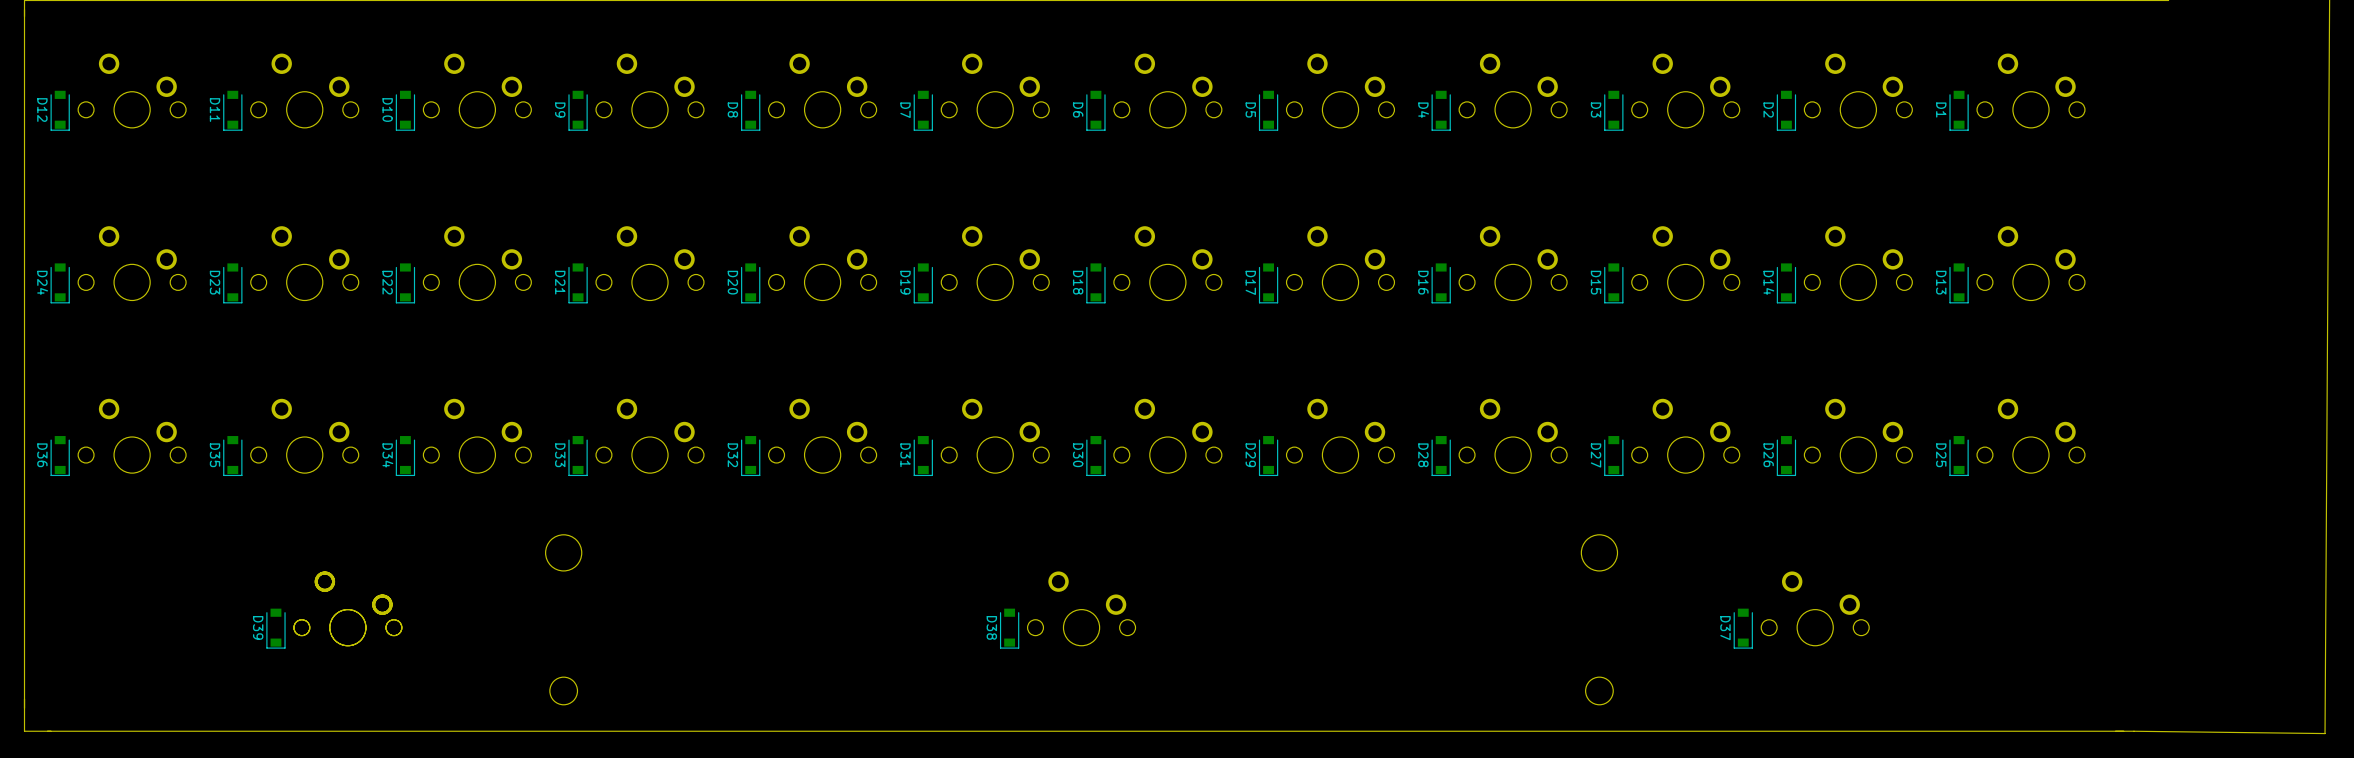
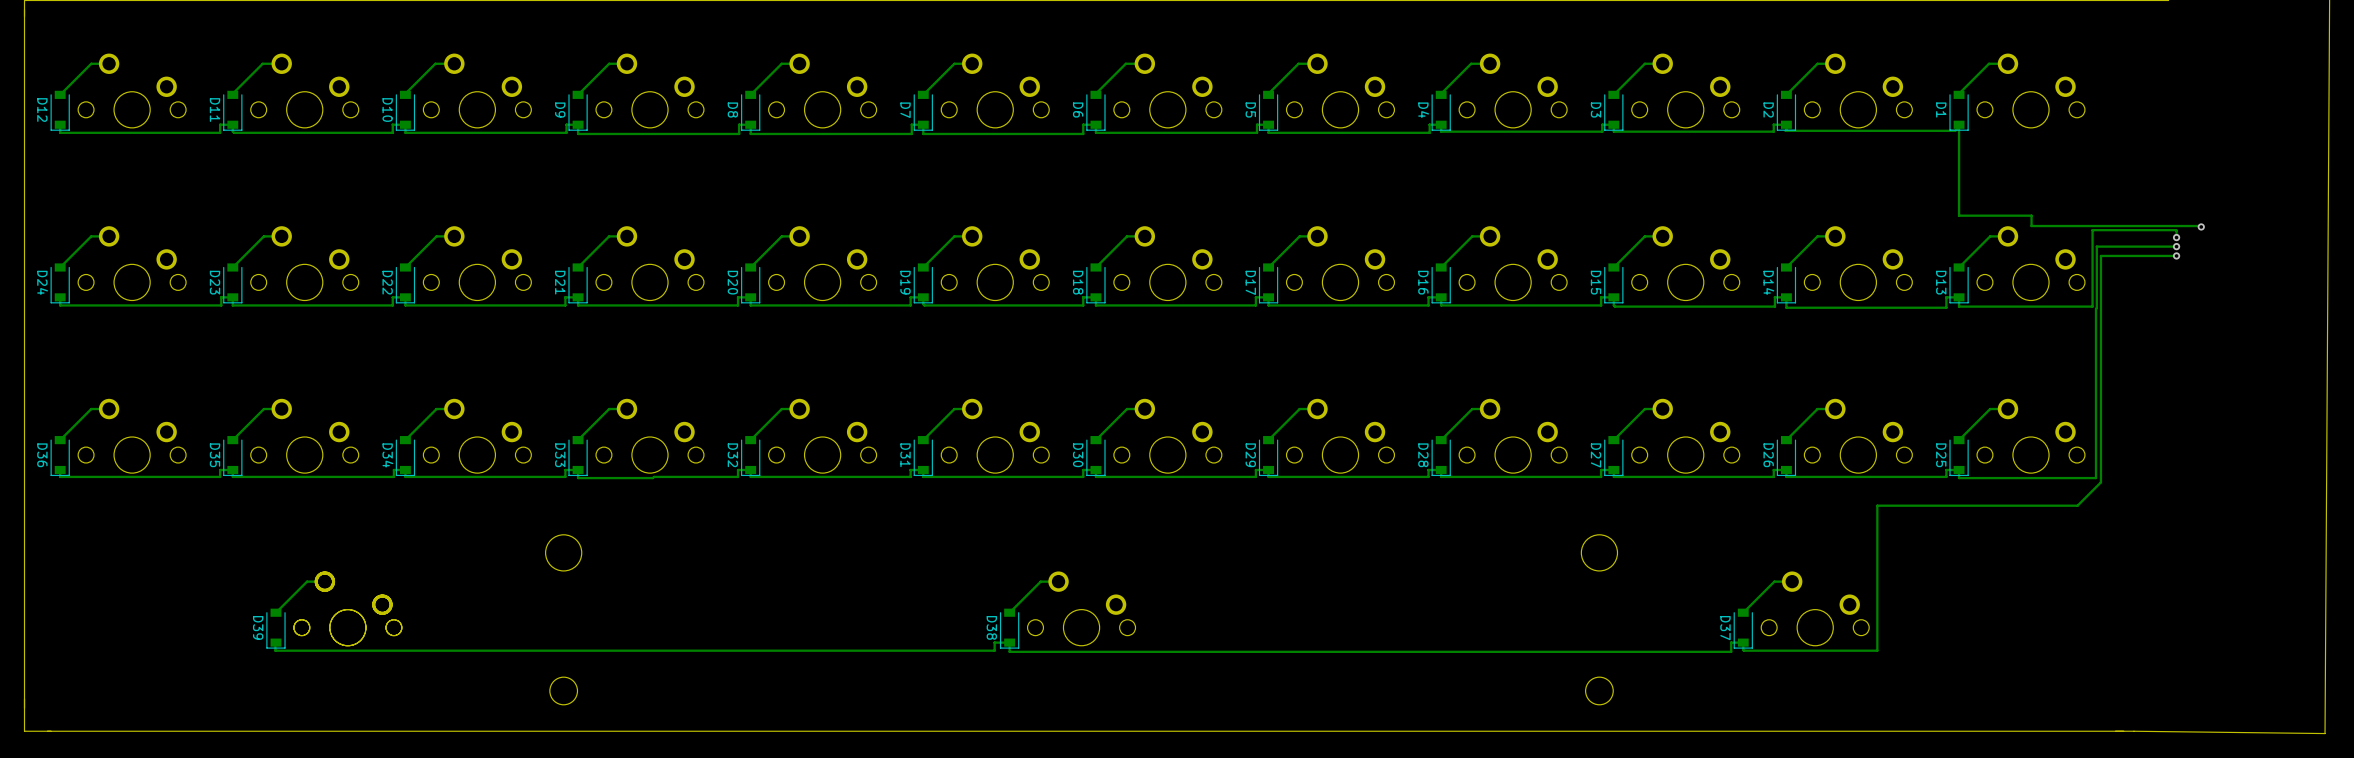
track: none -> (109, 63) (91, 63) (60, 94)
track: none -> (281, 63) (262, 63) (232, 93)
track: none -> (454, 63) (435, 63) (405, 93)
track: none -> (626, 63) (609, 63) (578, 94)
track: none -> (799, 63) (781, 63) (750, 94)
track: none -> (972, 63) (954, 63) (923, 94)
track: none -> (1144, 63) (1125, 63) (1095, 93)
track: none -> (1317, 63) (1298, 63) (1268, 93)
track: none -> (1490, 63) (1471, 63) (1441, 93)
track: none -> (1662, 63) (1644, 63) (1613, 94)
track: none -> (1835, 63) (1817, 63) (1786, 94)
track: none -> (2007, 63) (1988, 63) (1957, 94)
track: none -> (60, 124) (60, 132) (220, 132) (220, 124) (232, 124) (233, 132) (392, 132) (392, 124) (405, 124) (405, 132) (566, 132) (566, 124) (578, 124) (578, 133) (739, 133) (739, 124) (750, 124) (750, 133) (911, 133) (911, 124) (923, 124) (923, 133) (1083, 133) (1083, 124) (1095, 124) (1095, 132) (1257, 132) (1257, 124) (1268, 124) (1268, 132) (1429, 132) (1429, 124) (1441, 124) (1441, 131) (1602, 131) (1602, 124) (1613, 124) (1613, 131) (1773, 131) (1773, 124) (1786, 124) (1785, 130) (1955, 130) (1959, 127)
track: none -> (1959, 124) (1959, 215) (2031, 215) (2031, 226) (2201, 226)
via: none -> (2201, 226)
track: none -> (109, 236) (91, 236) (60, 267)
track: none -> (281, 236) (263, 236) (232, 267)
track: none -> (454, 236) (436, 236) (405, 267)
track: none -> (626, 236) (609, 236) (578, 267)
track: none -> (799, 236) (781, 236) (750, 267)
track: none -> (972, 236) (954, 236) (923, 267)
track: none -> (1144, 236) (1127, 236) (1095, 267)
track: none -> (1317, 236) (1299, 236) (1268, 267)
track: none -> (1490, 236) (1472, 236) (1441, 267)
track: none -> (1662, 236) (1644, 236) (1613, 267)
track: none -> (1835, 236) (1817, 236) (1786, 267)
track: none -> (2007, 236) (1990, 236) (1959, 267)
track: none -> (2176, 237) (2176, 230) (2092, 230) (2092, 306) (1959, 306) (1959, 297) (1946, 297) (1946, 307) (1786, 307) (1786, 297) (1774, 297) (1774, 306) (1614, 306) (1613, 297) (1601, 297) (1601, 305) (1441, 305) (1441, 297) (1428, 297) (1428, 305) (1268, 305) (1268, 297) (1255, 297) (1255, 305) (1095, 305) (1095, 297) (1083, 297) (1083, 305) (924, 305) (923, 297) (910, 297) (910, 305) (750, 305) (750, 297) (738, 297) (738, 305) (578, 305) (578, 297) (565, 297) (565, 305) (405, 305) (405, 297) (392, 297) (392, 305) (232, 305) (232, 297) (221, 297) (221, 305) (60, 305) (60, 297)
via: none -> (2176, 237)
track: none -> (2176, 246) (2096, 246) (2096, 478) (1959, 478) (1959, 470) (1946, 470) (1946, 476) (1786, 476) (1786, 470) (1773, 470) (1773, 476) (1613, 476) (1613, 470) (1601, 470) (1601, 476) (1441, 476) (1441, 470) (1428, 470) (1428, 476) (1268, 476) (1268, 470) (1255, 470) (1255, 476) (1095, 476) (1095, 470) (1083, 470) (1083, 476) (923, 476) (923, 470) (910, 470) (910, 476) (750, 476) (750, 470) (738, 470) (738, 476) (652, 478) (578, 478) (578, 470) (565, 470) (565, 476) (405, 476) (405, 470) (393, 470) (393, 476) (232, 476) (232, 470) (220, 470) (220, 476) (60, 476) (60, 470)
via: none -> (2176, 246)
track: none -> (2176, 255) (2100, 255) (2100, 482) (2077, 505) (1877, 505) (1877, 650) (1743, 650) (1743, 642) (1731, 642) (1731, 651) (1009, 651) (1009, 642) (994, 642) (994, 650) (275, 650) (275, 642)
via: none -> (2176, 255)
track: none -> (109, 409) (91, 409) (60, 440)
track: none -> (281, 409) (263, 409) (232, 440)
track: none -> (454, 409) (436, 409) (405, 440)
track: none -> (626, 409) (609, 409) (578, 440)
track: none -> (799, 409) (781, 409) (750, 440)
track: none -> (972, 409) (954, 409) (923, 440)
track: none -> (1144, 409) (1127, 409) (1095, 440)
track: none -> (1317, 409) (1299, 409) (1268, 440)
track: none -> (1490, 409) (1472, 409) (1441, 440)
track: none -> (1662, 409) (1644, 409) (1613, 440)
track: none -> (1835, 409) (1817, 409) (1786, 440)
track: none -> (2007, 409) (1990, 409) (1959, 440)
track: none -> (324, 581) (307, 581) (275, 612)
track: none -> (1058, 581) (1040, 581) (1009, 612)
track: none -> (1792, 581) (1774, 581) (1743, 612)

